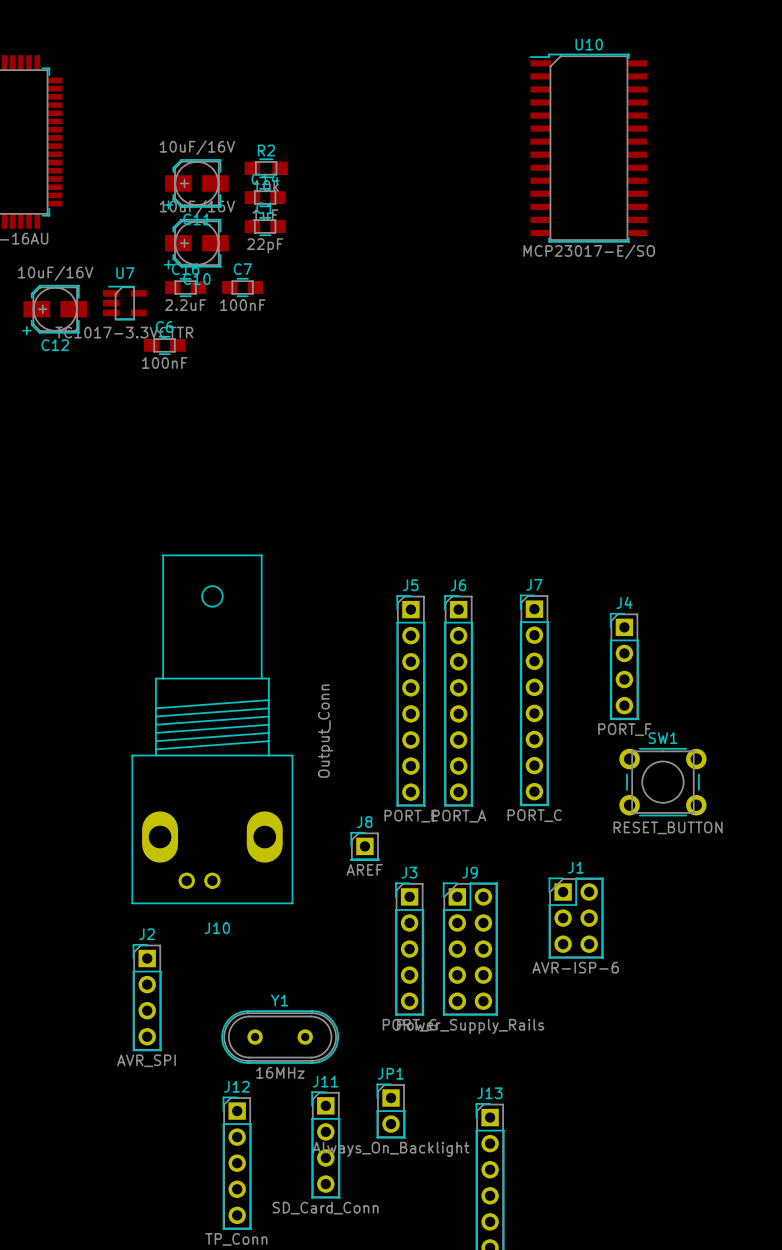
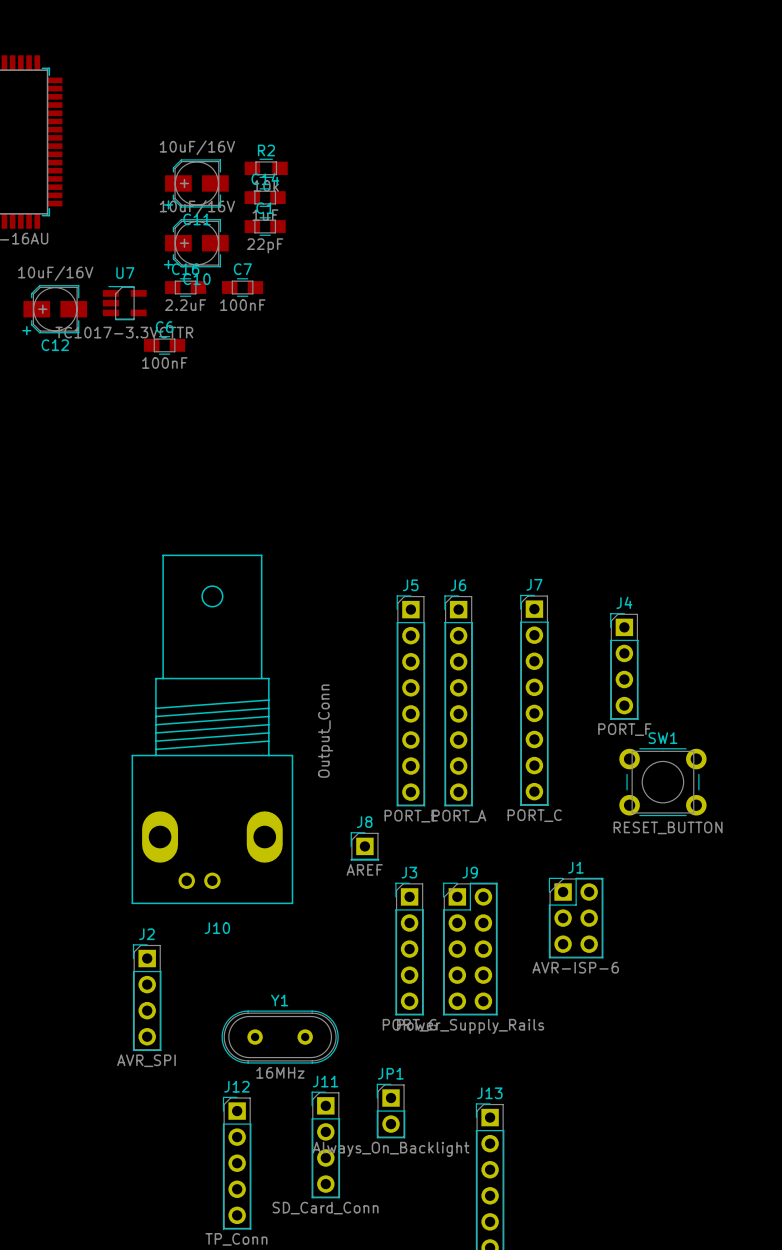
U10: MCP23017-E/SO (588, 148) -> none

